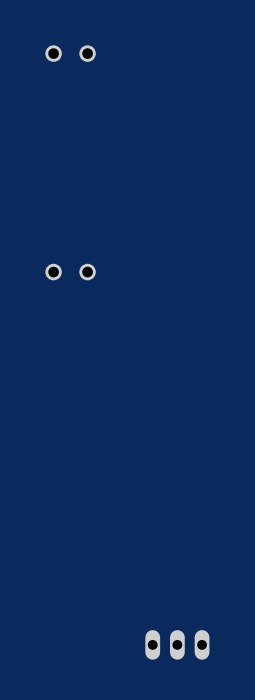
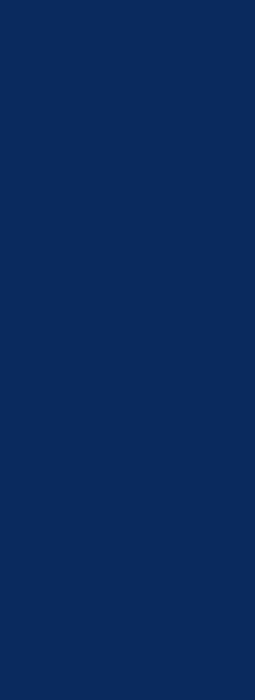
part: (70, 53) -> none
part: (70, 272) -> none
part: (177, 644) -> none

